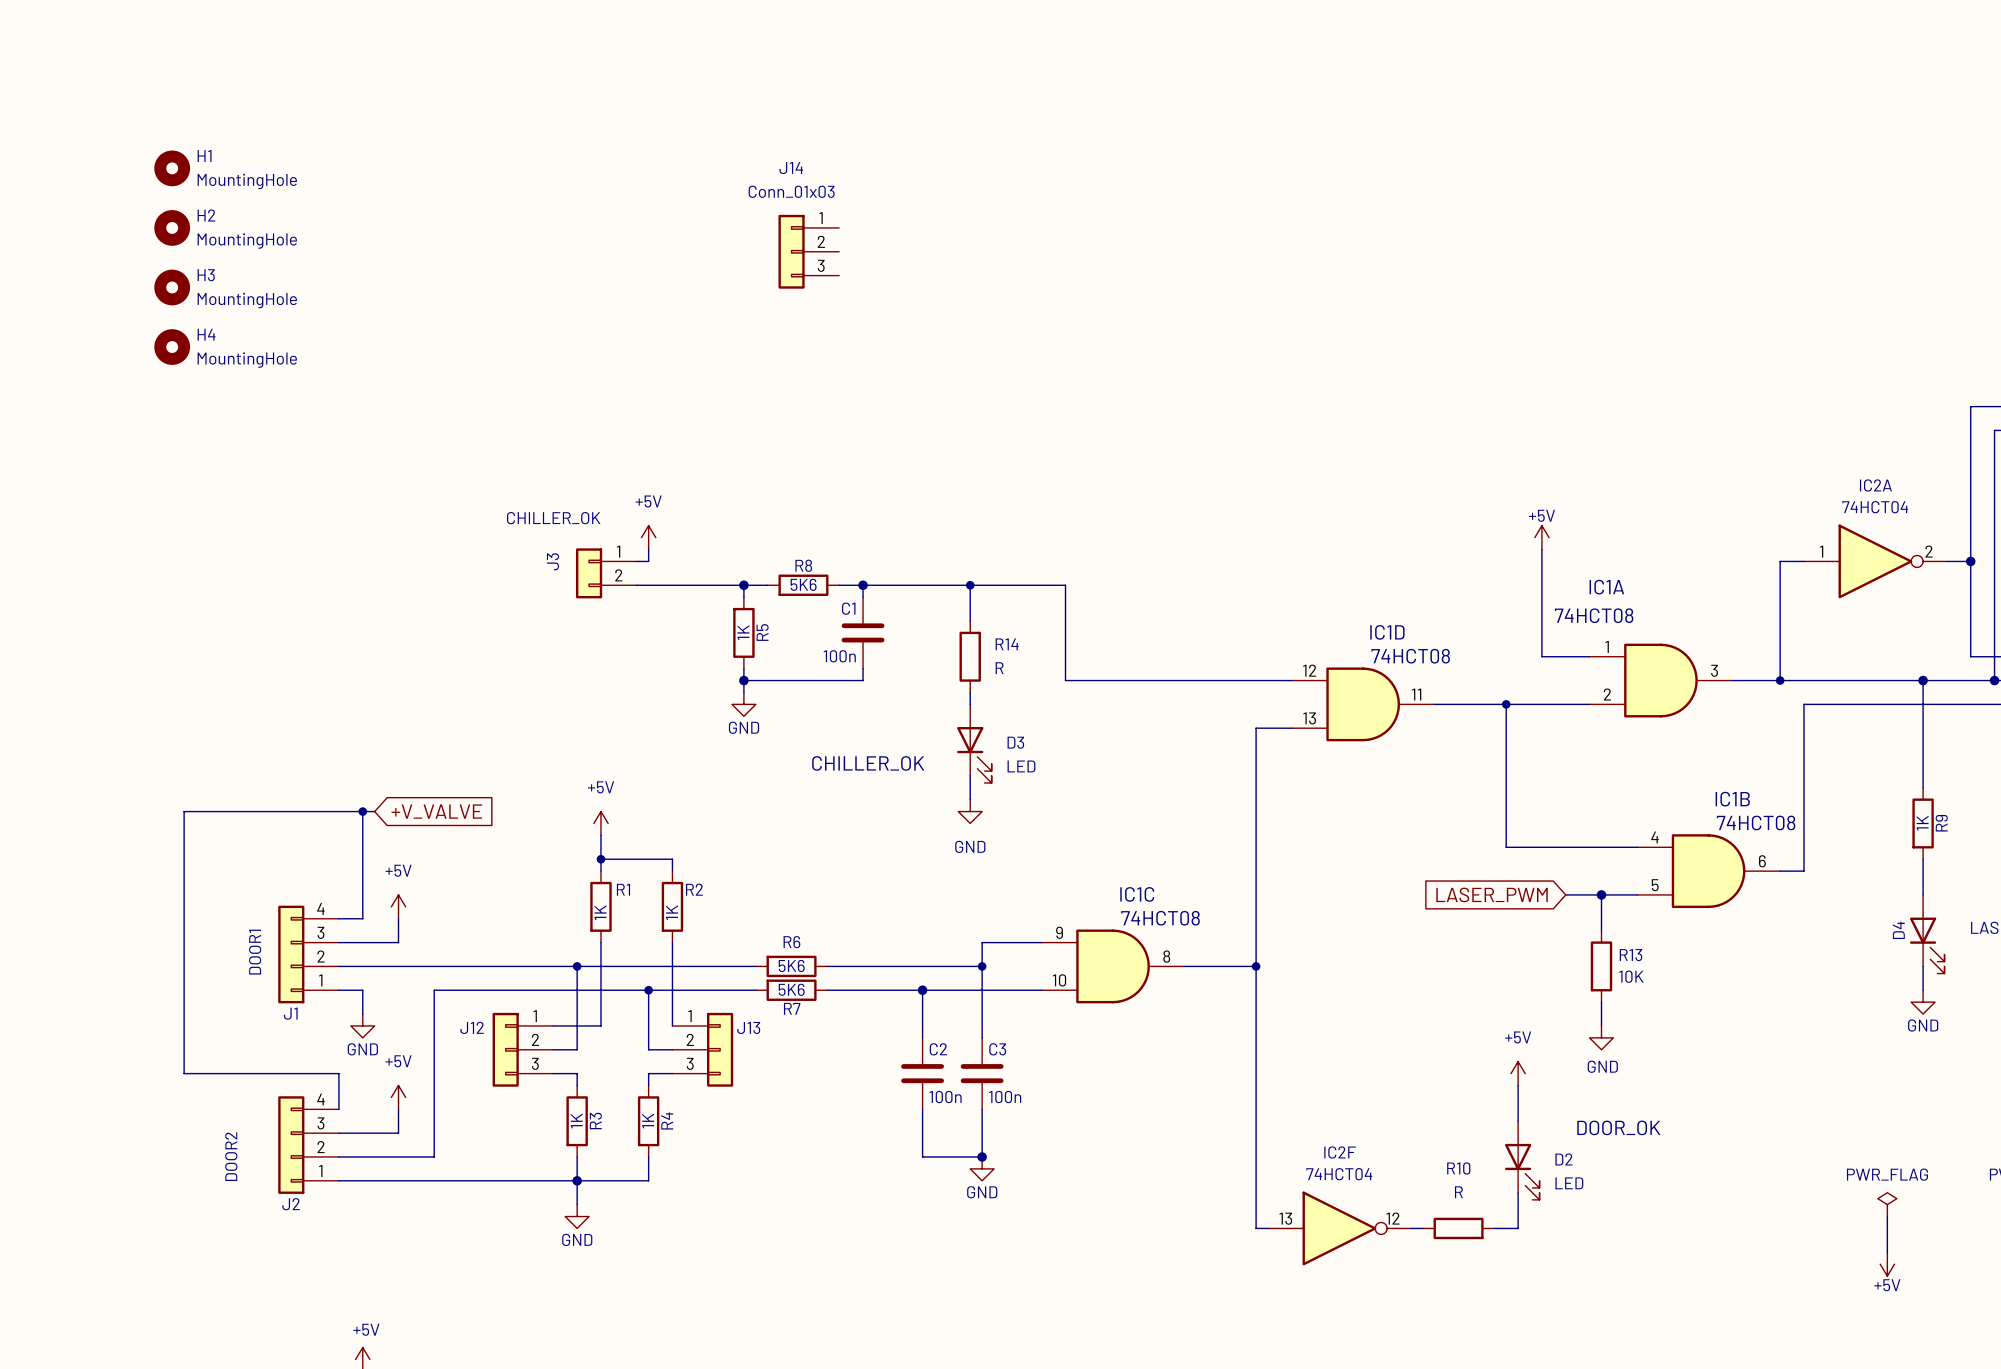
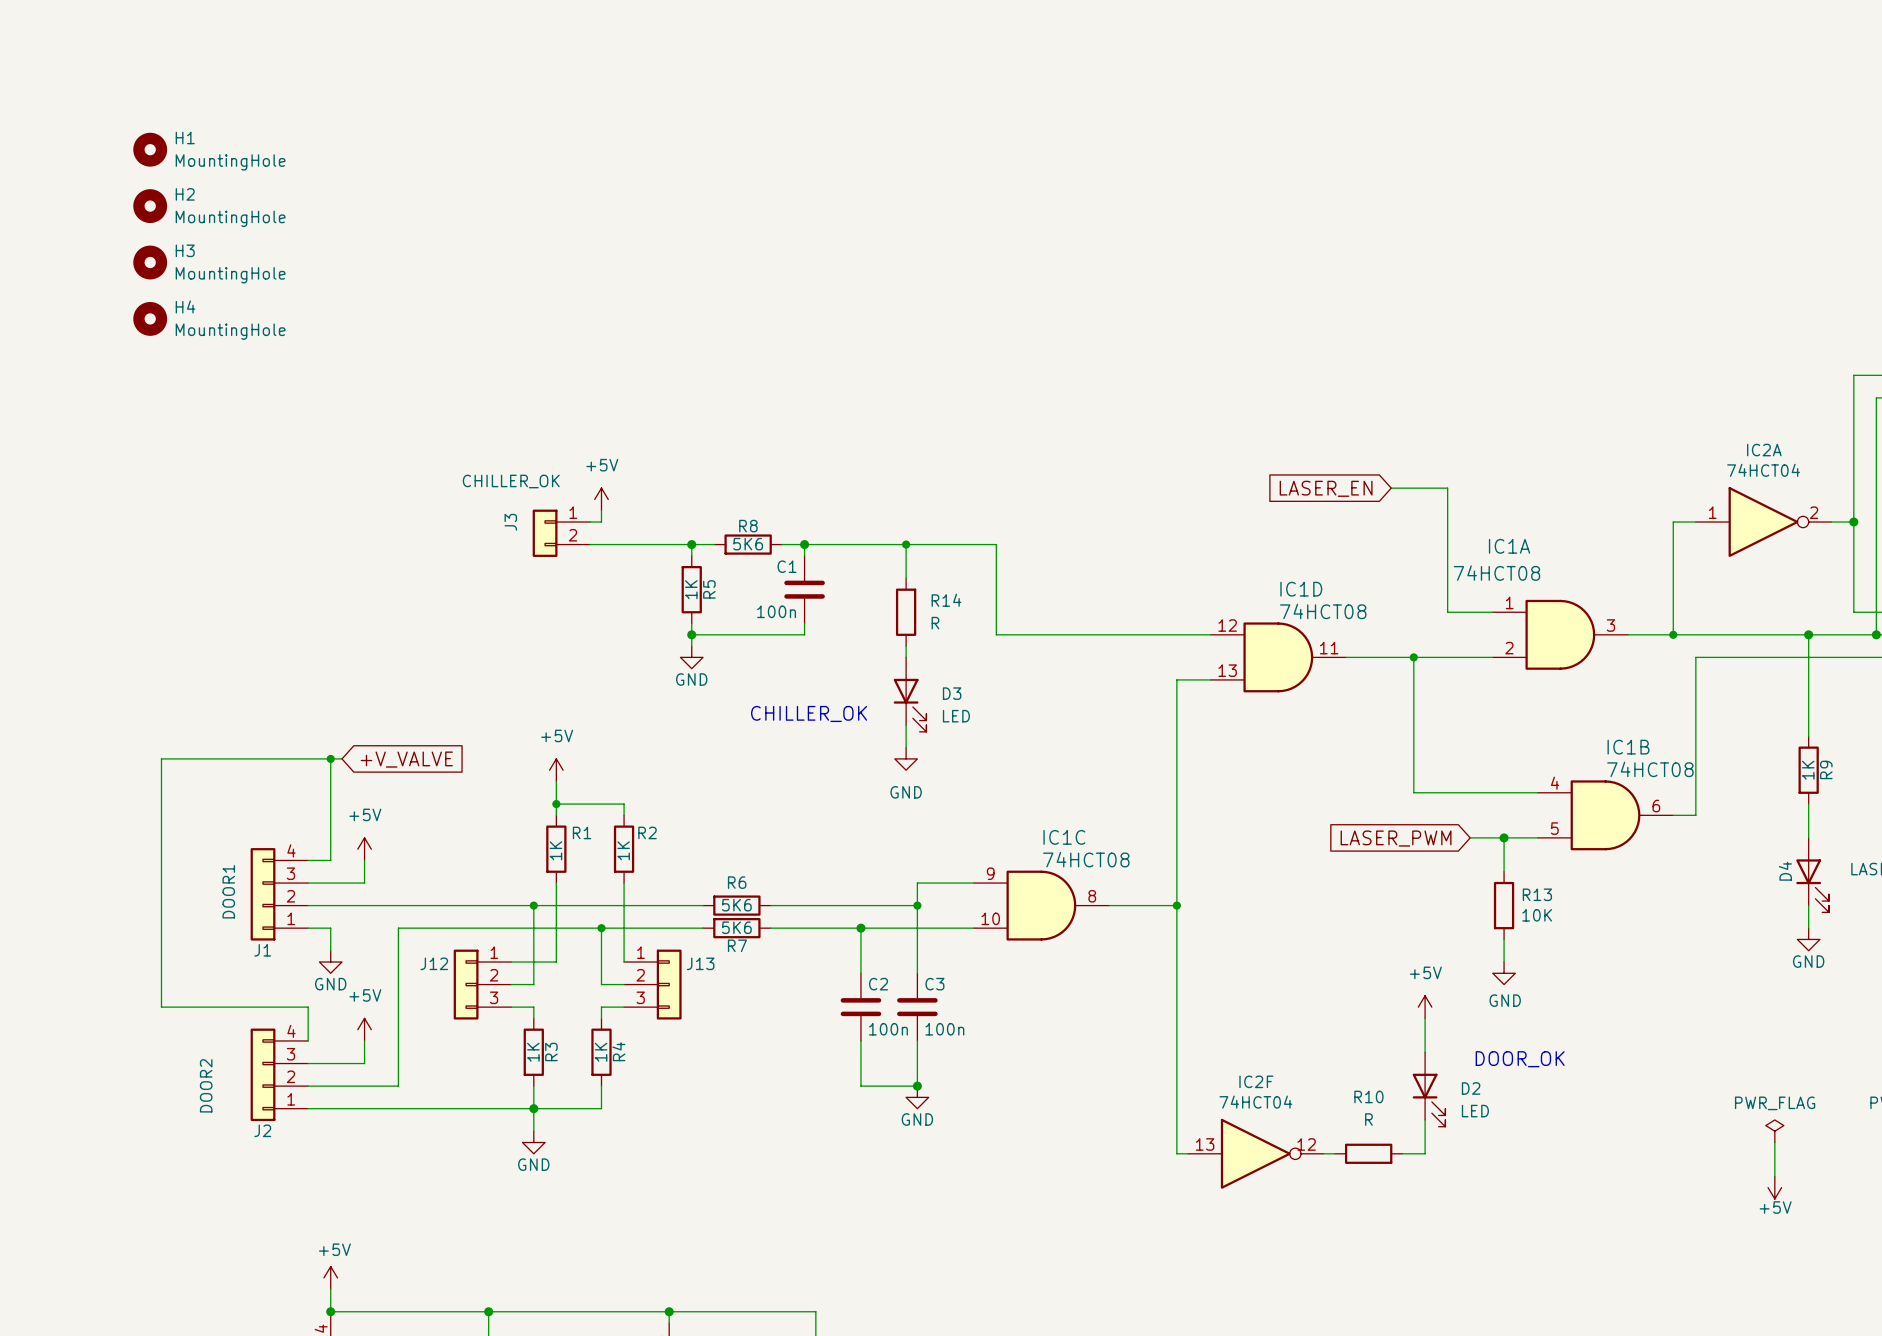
J14: Conn_01x03 (808, 251) -> none
global label: none -> LASER_EN (1326, 488)
wire: none -> (1391, 488) (1447, 488) (1447, 510)
power symbol: +5V (1541, 537) -> none

